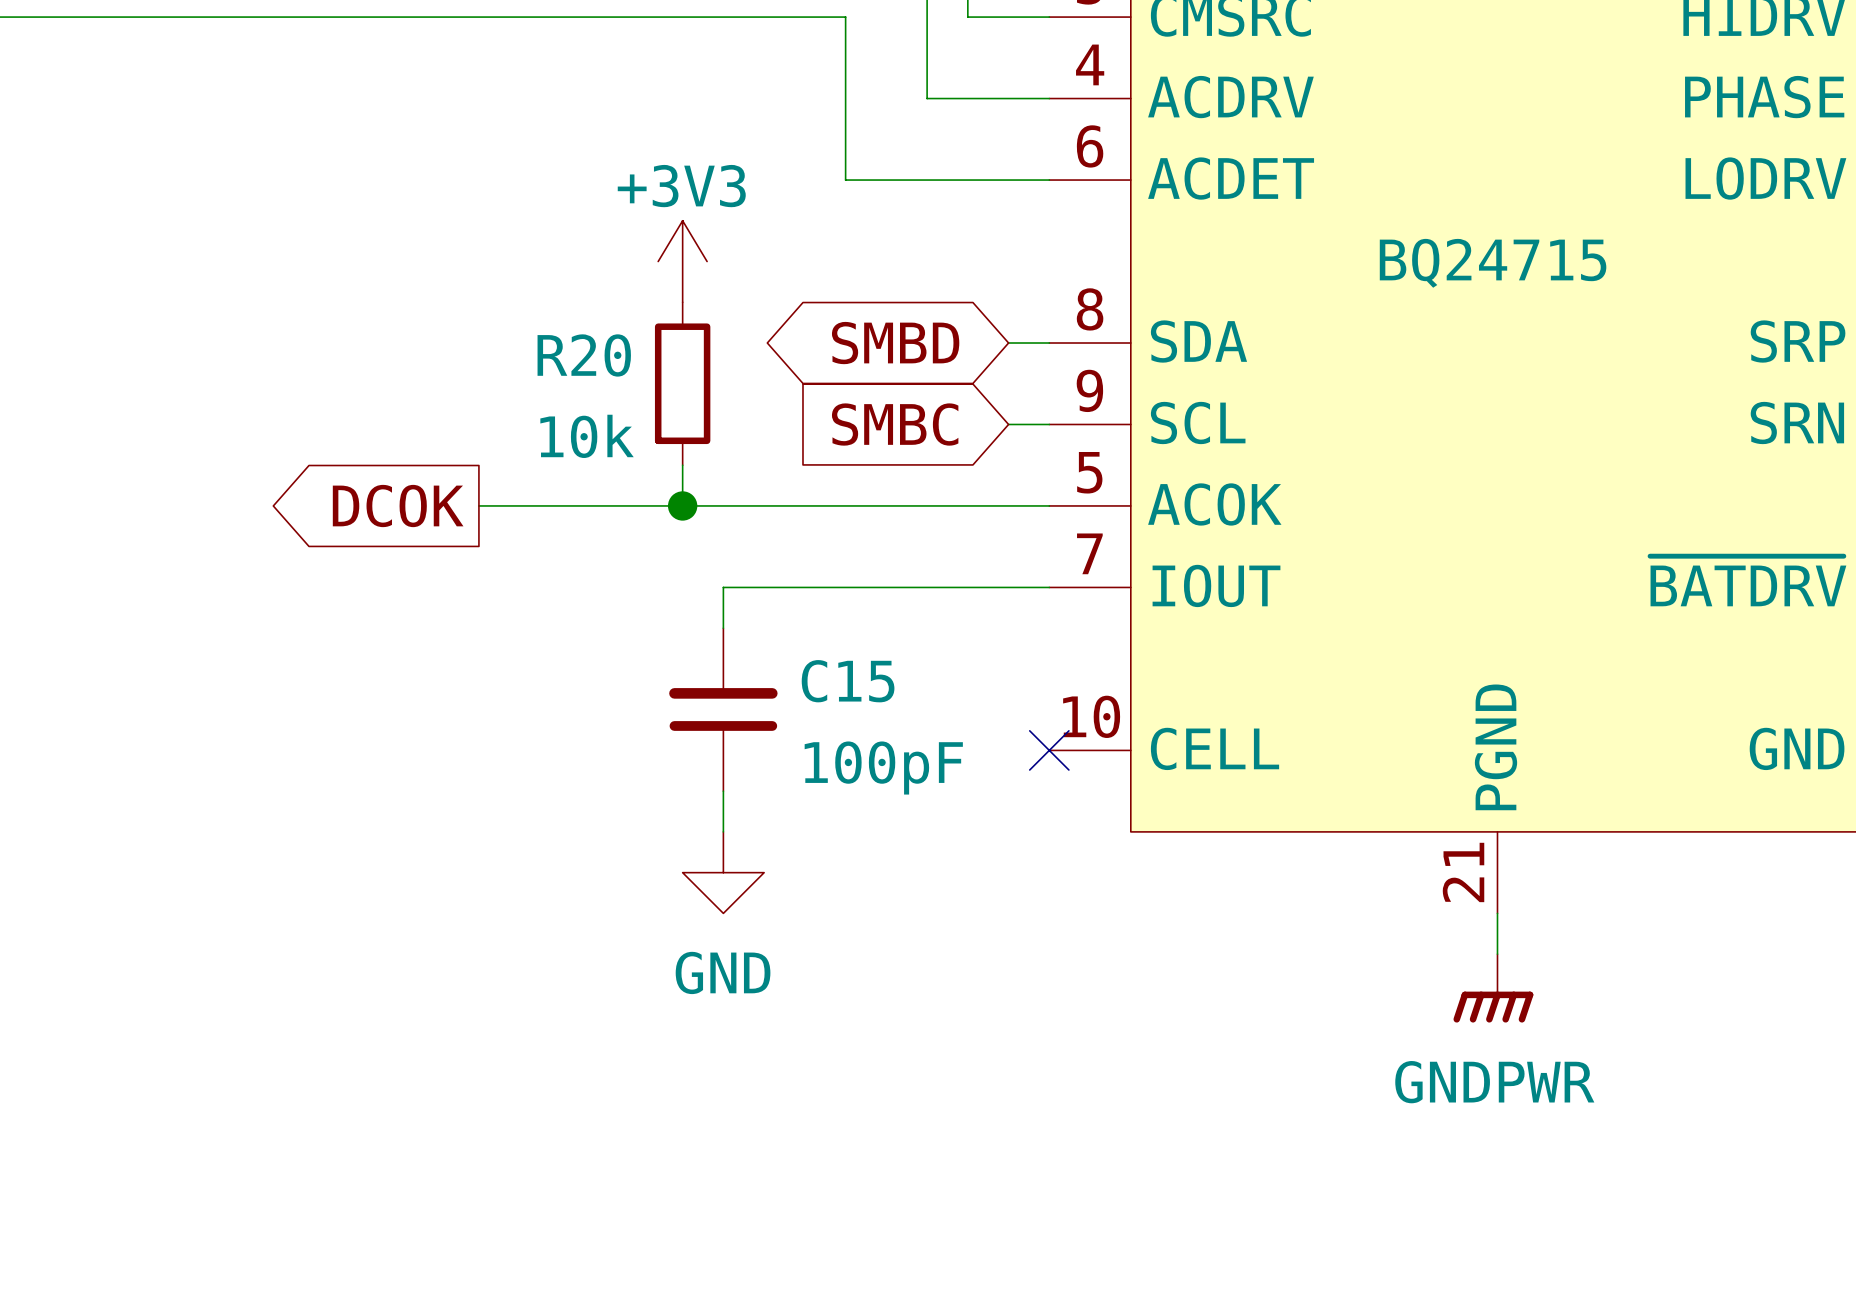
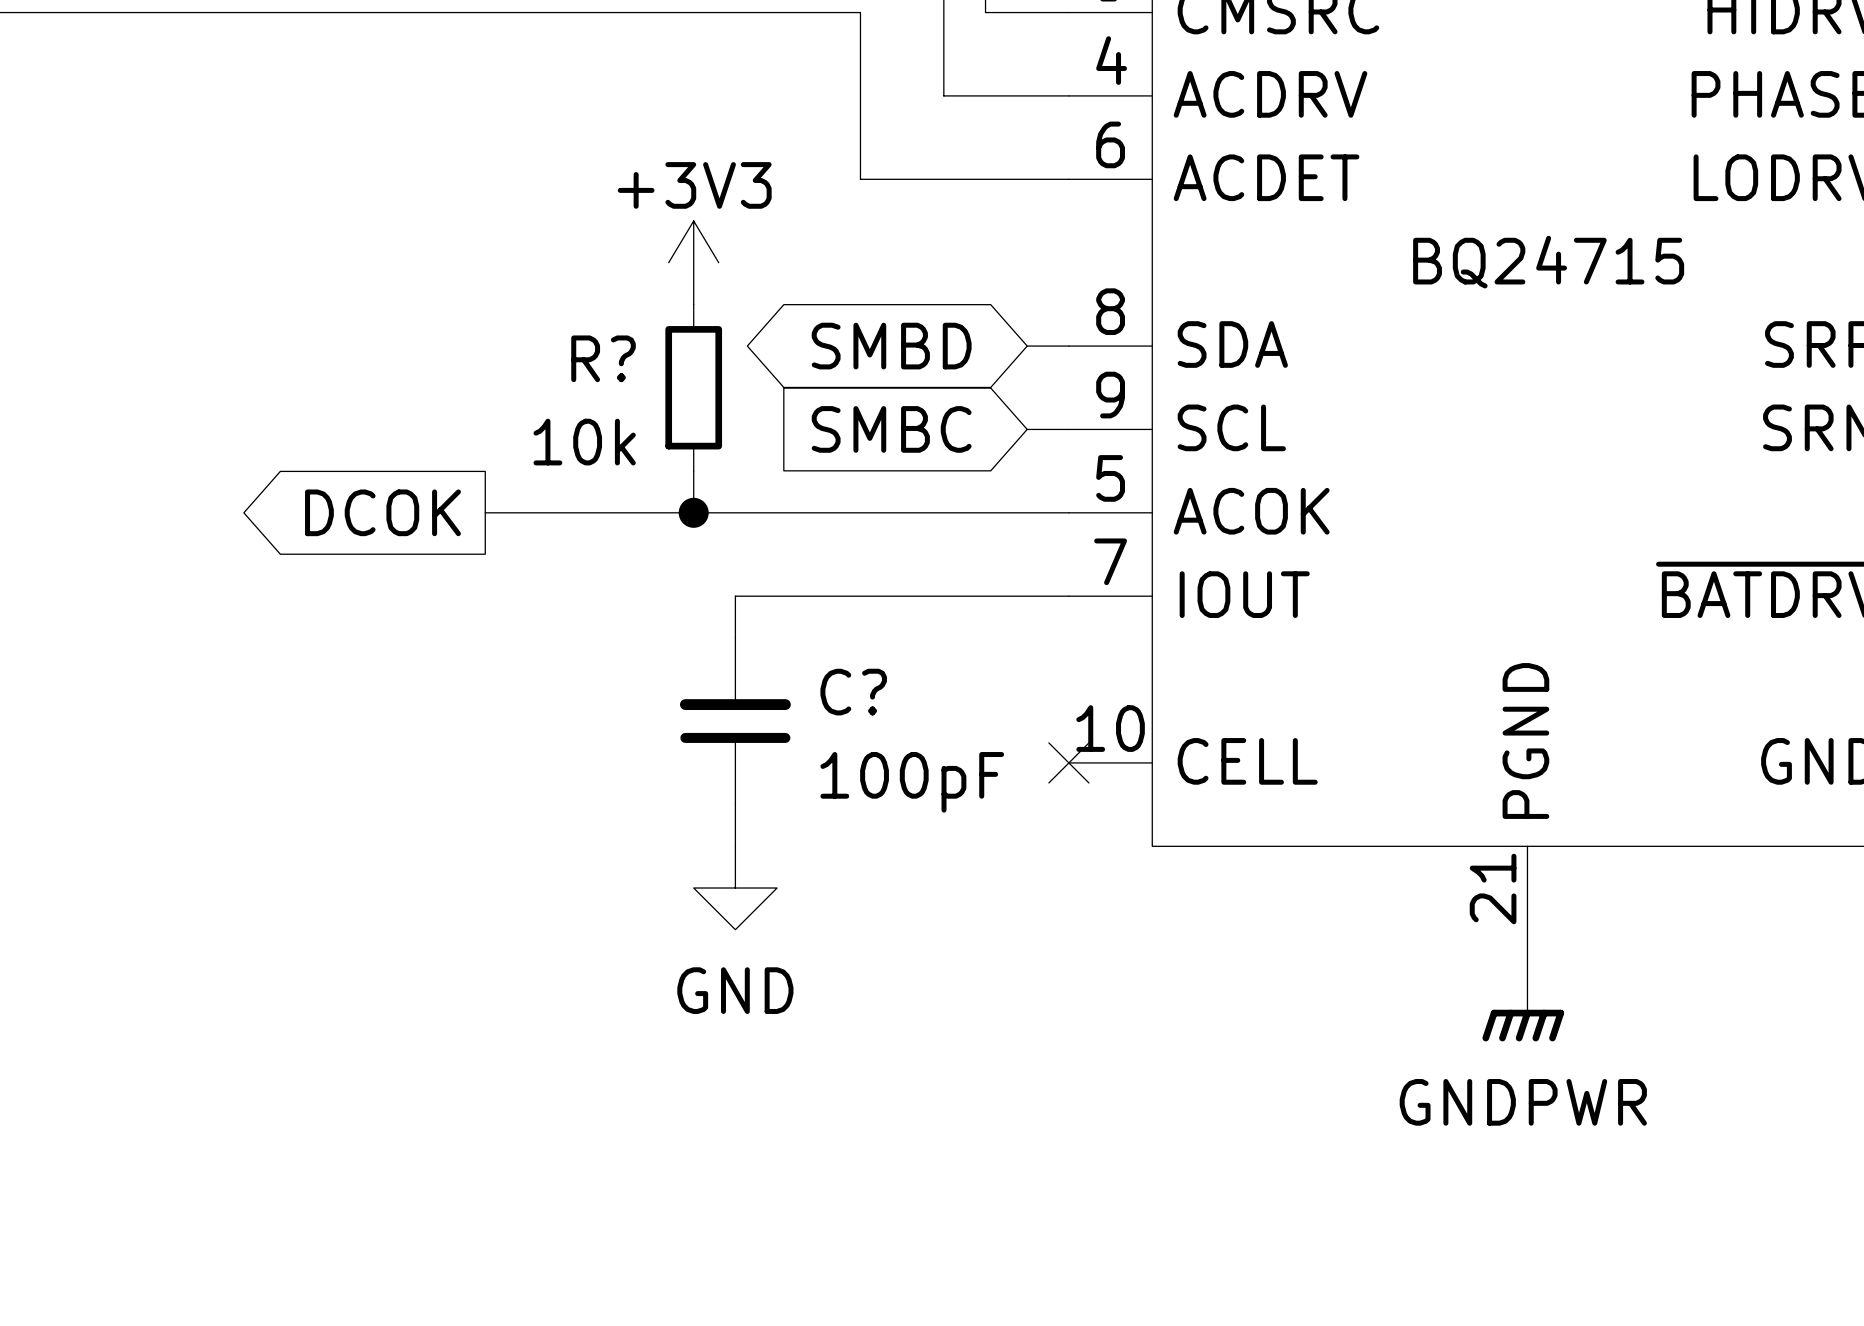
R20 name: R20 (584, 355) -> R? (603, 358)
C15 name: C15 (848, 681) -> C? (853, 692)

